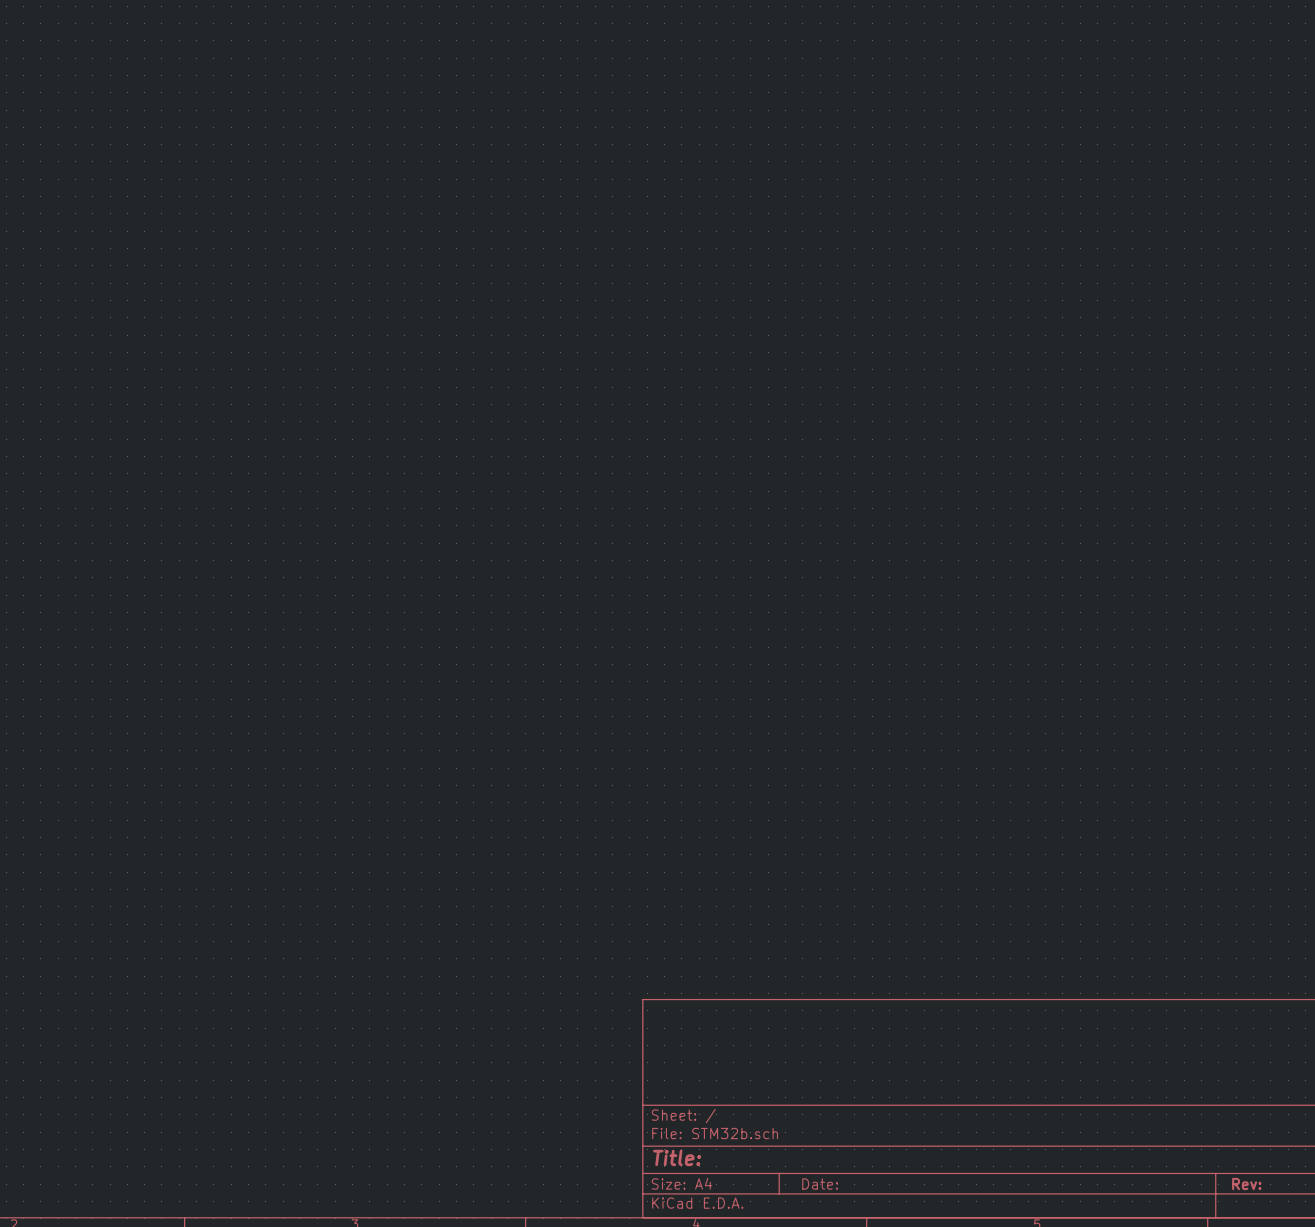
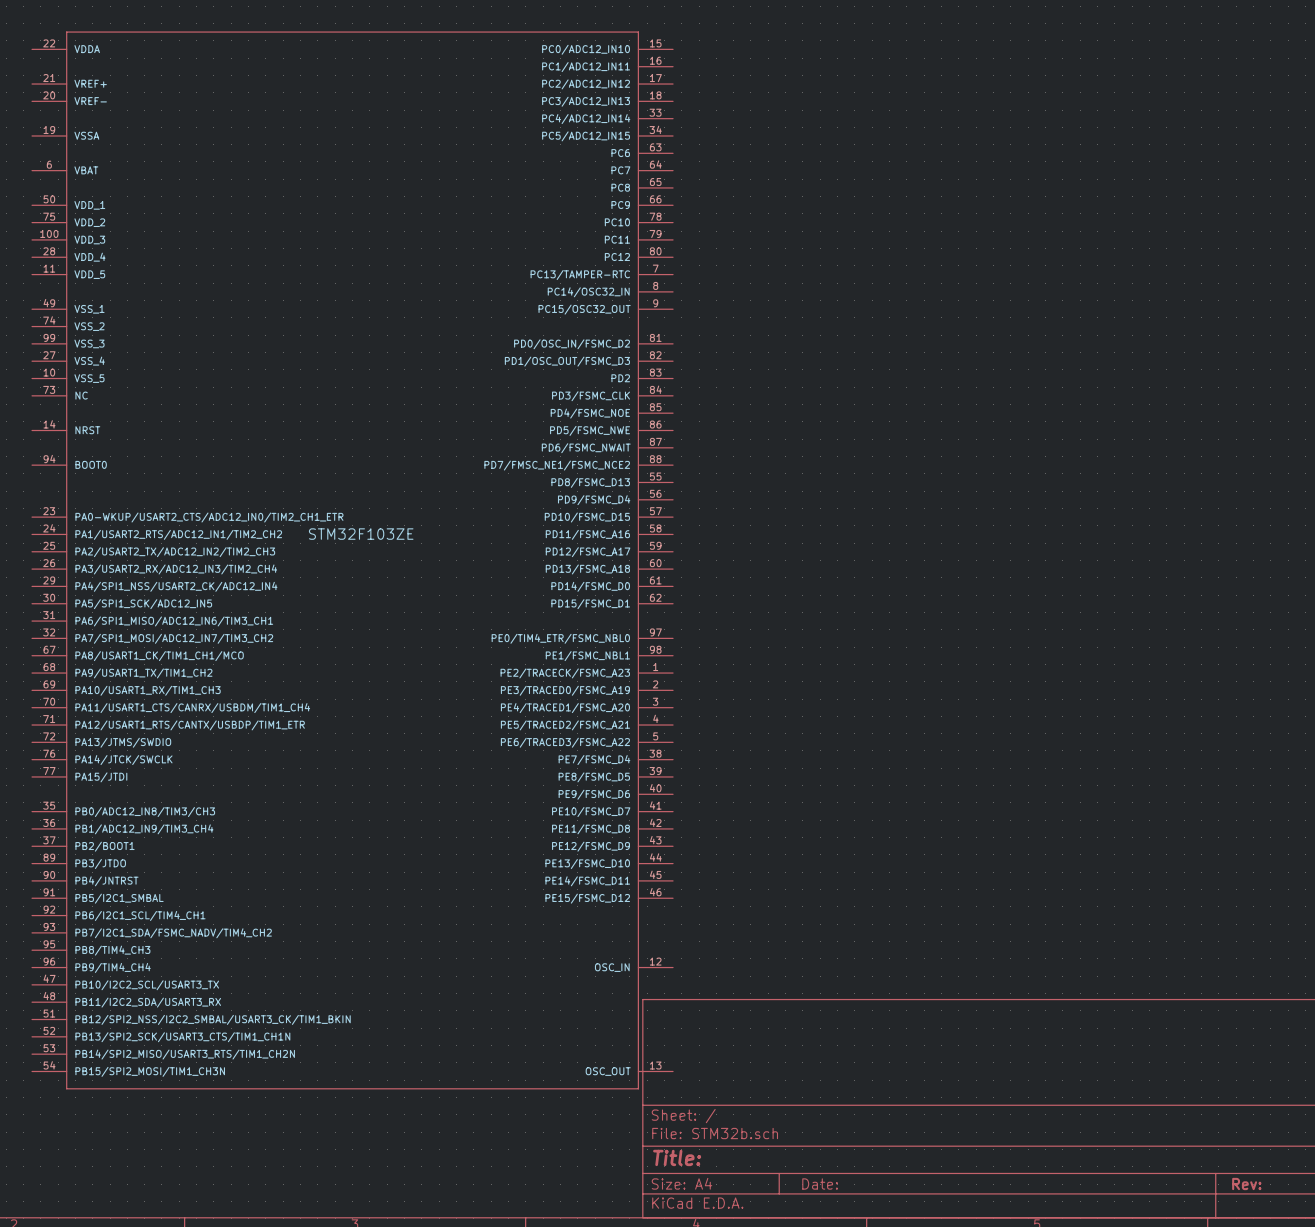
part: none -> STM32F103ZE (352, 560)

